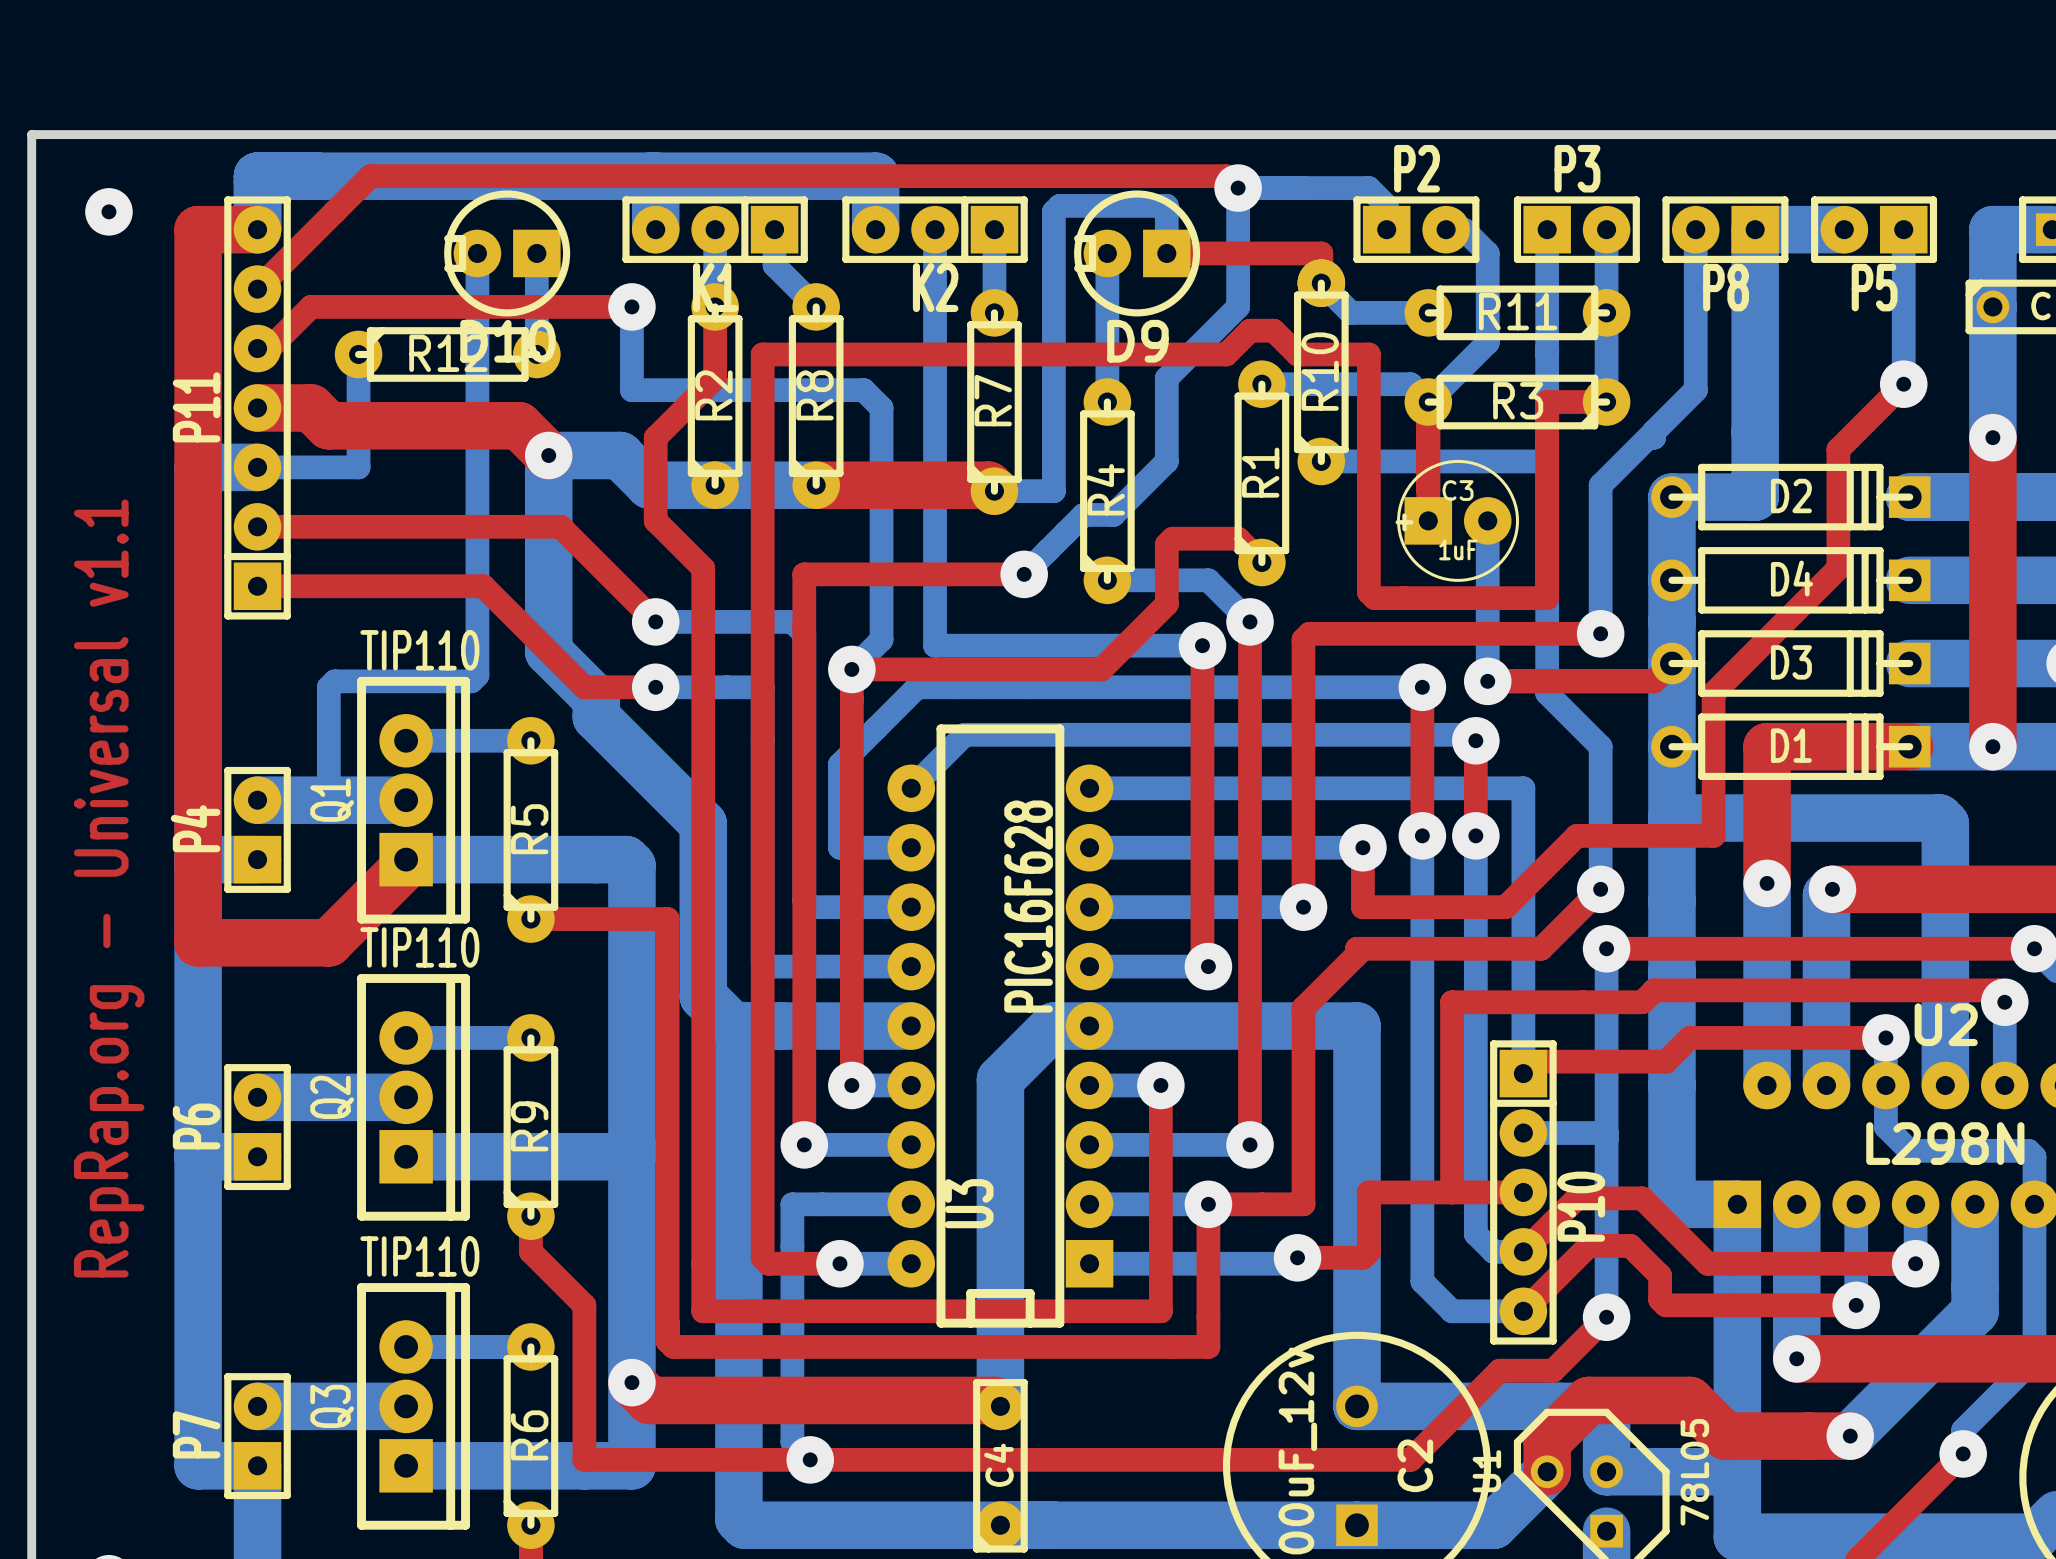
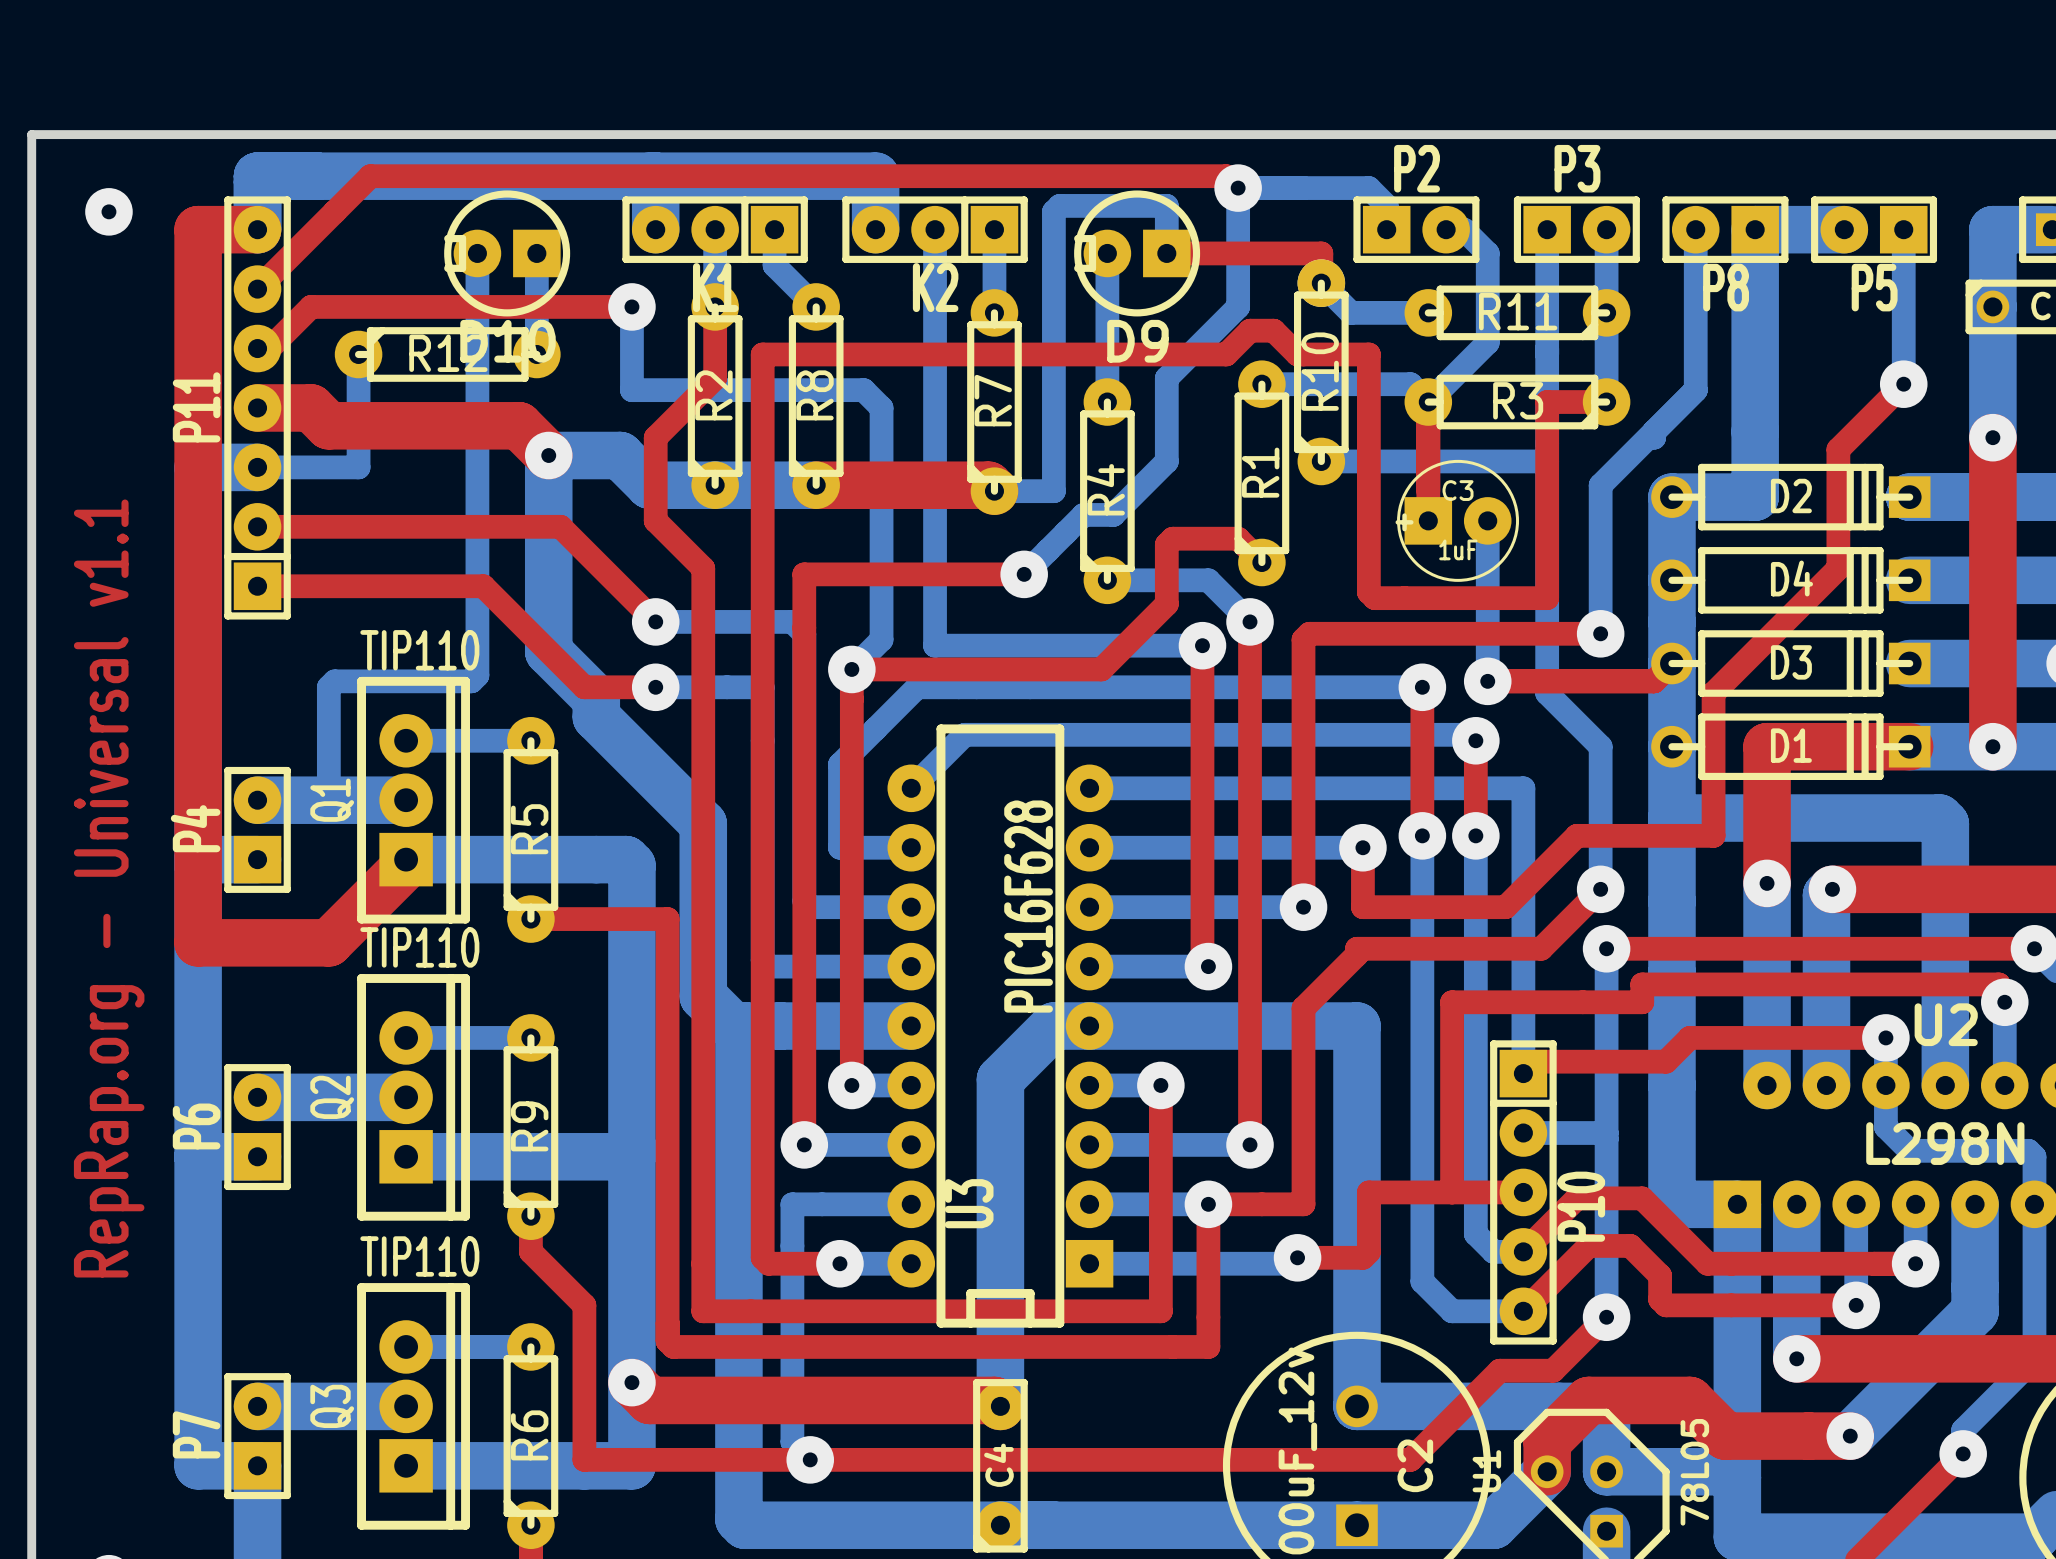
top track: (1642, 1002) (1654, 990) (1998, 990) (2004, 996) (2004, 1002) -> (1642, 1002) (1642, 984) (1998, 984) (2004, 1002)

